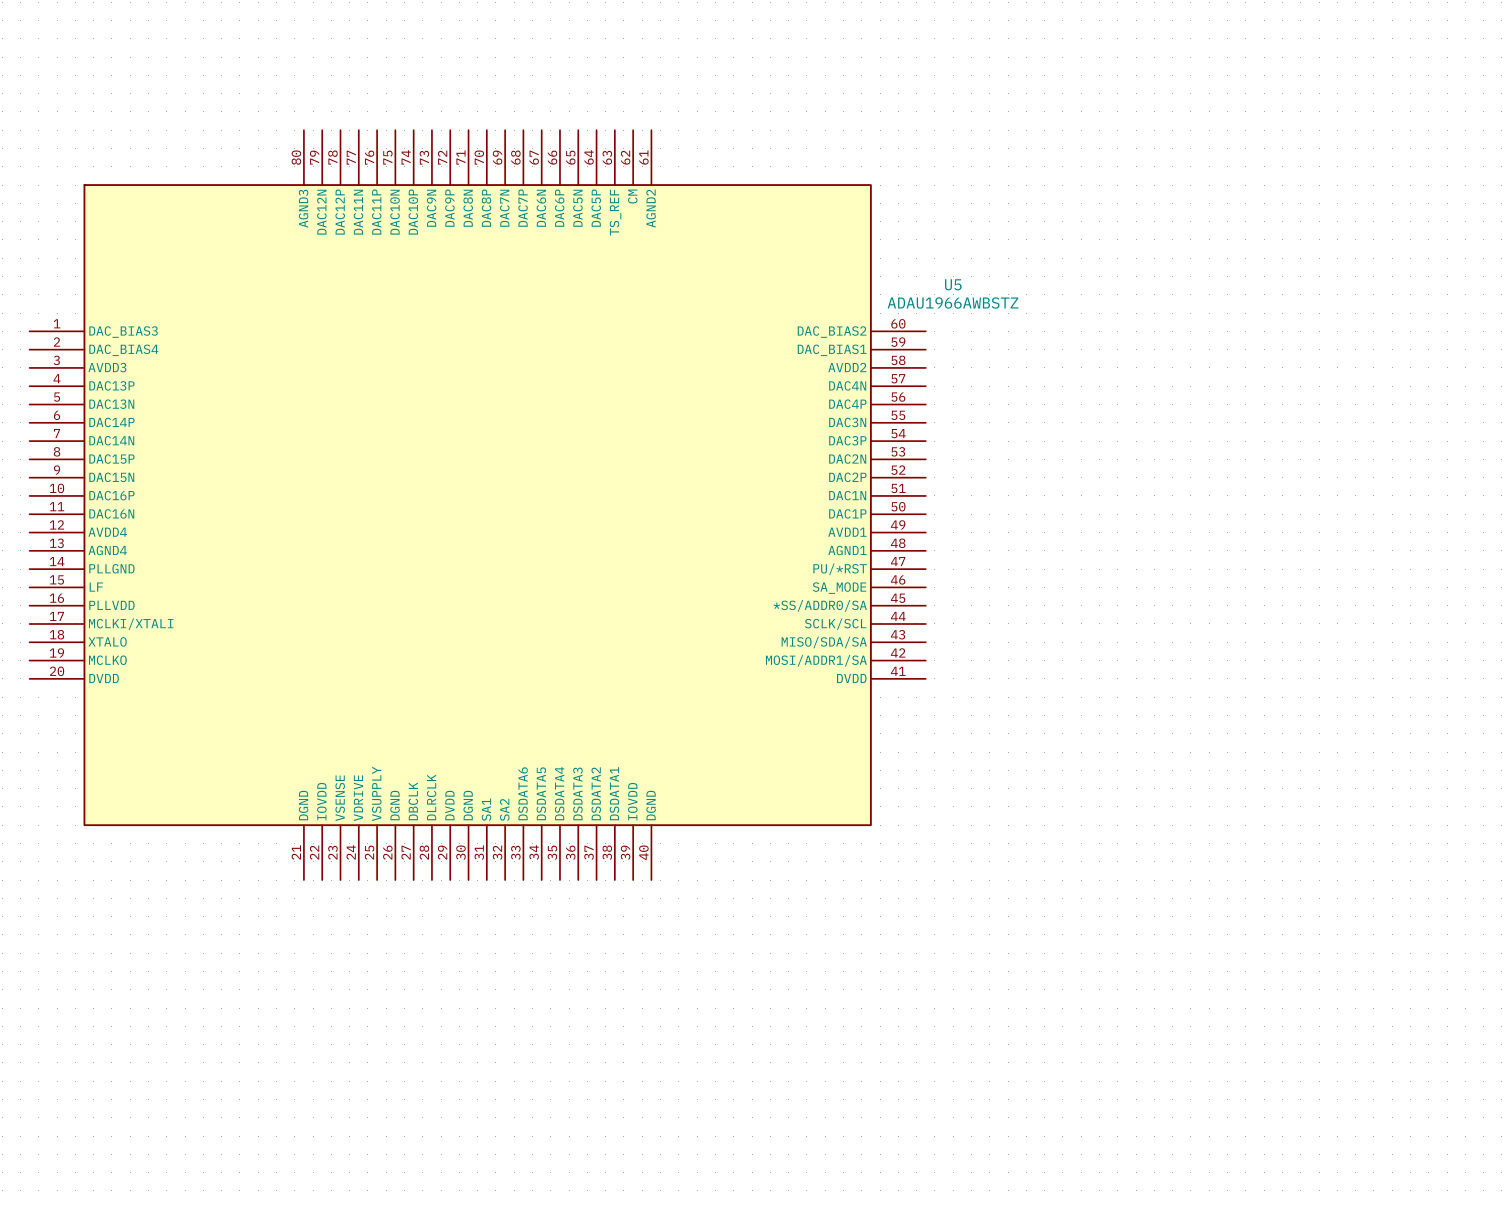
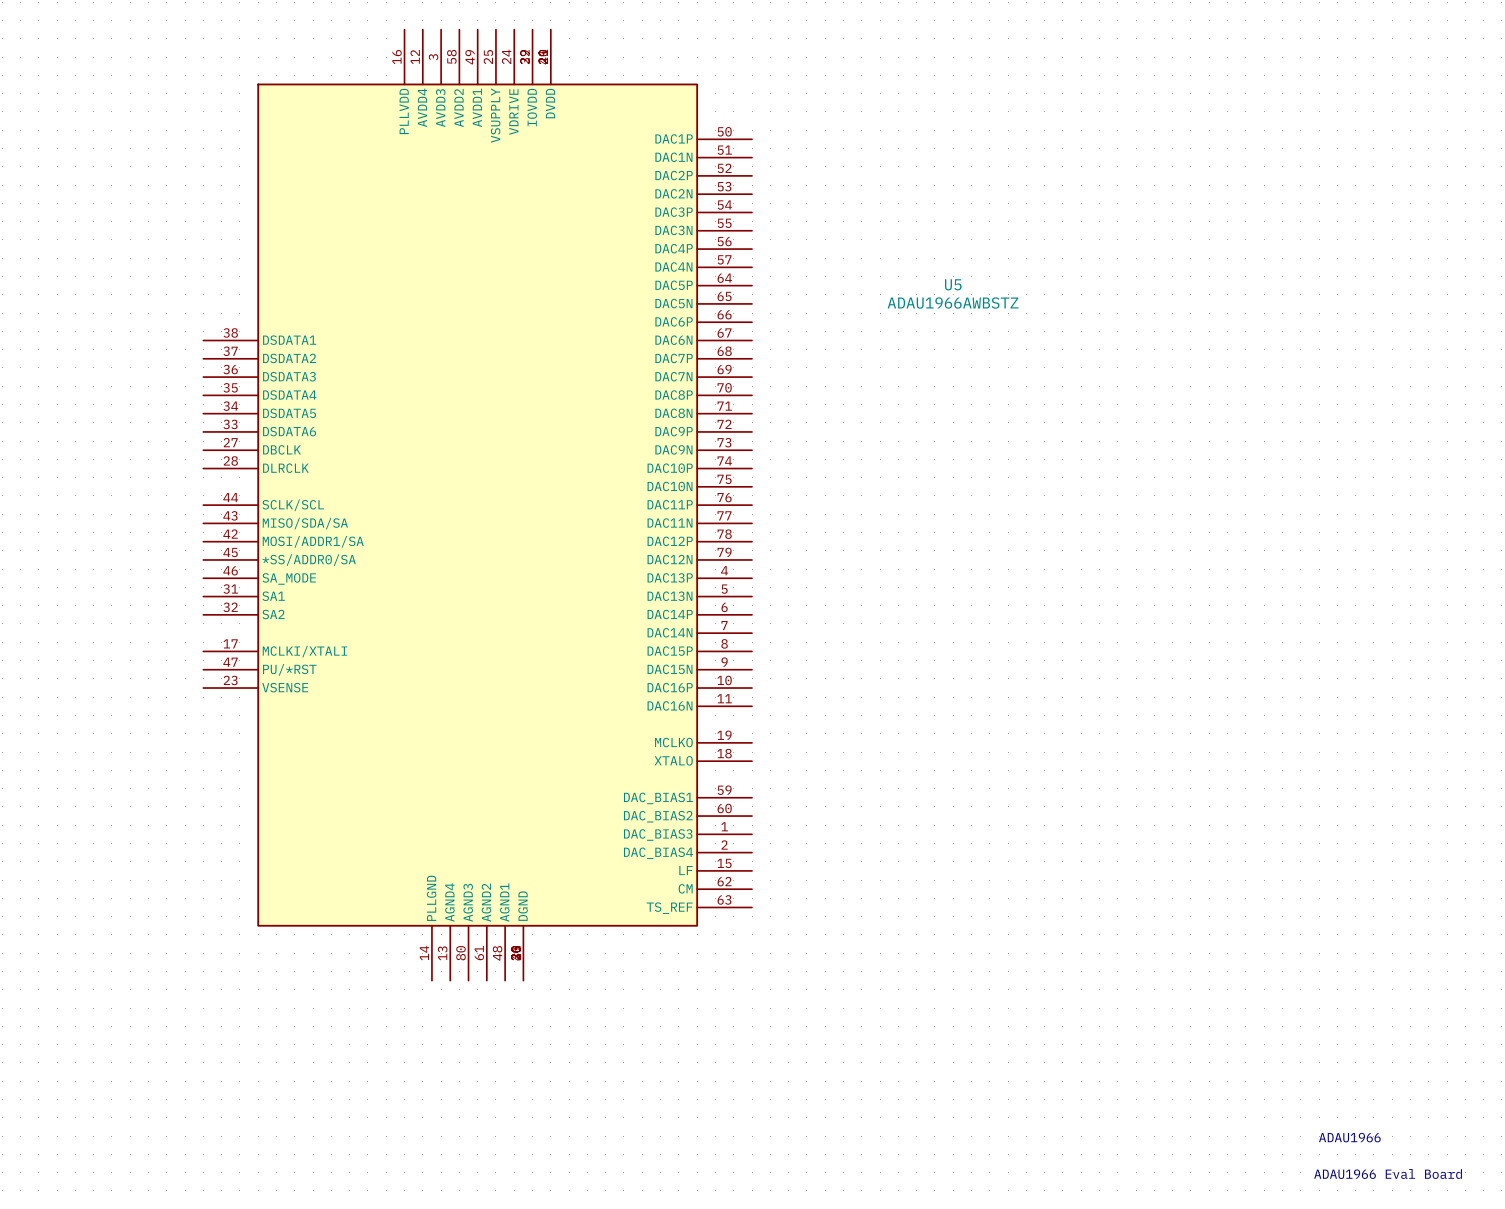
U5 symbol: [29, 130, 926, 881] -> [203, 29, 753, 981]
text: none -> ADAU1966 (1349, 1137)
text: none -> ADAU1966 Eval Board (1388, 1174)

